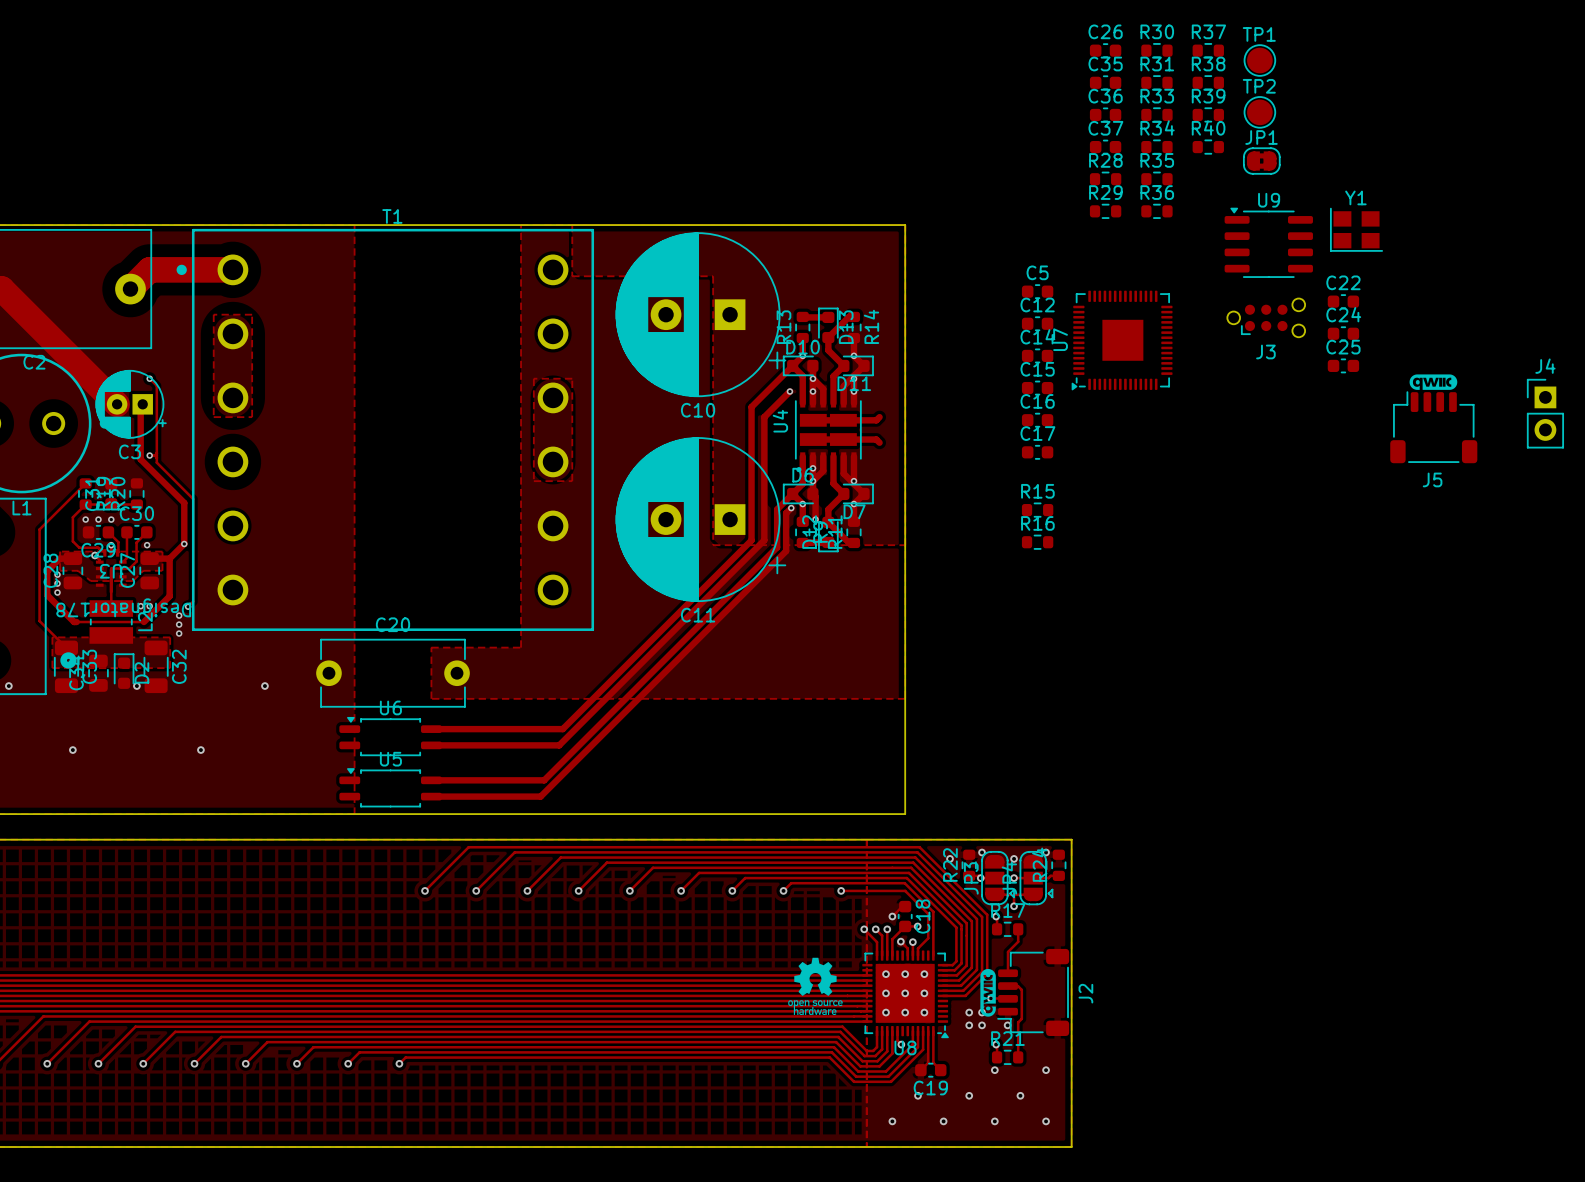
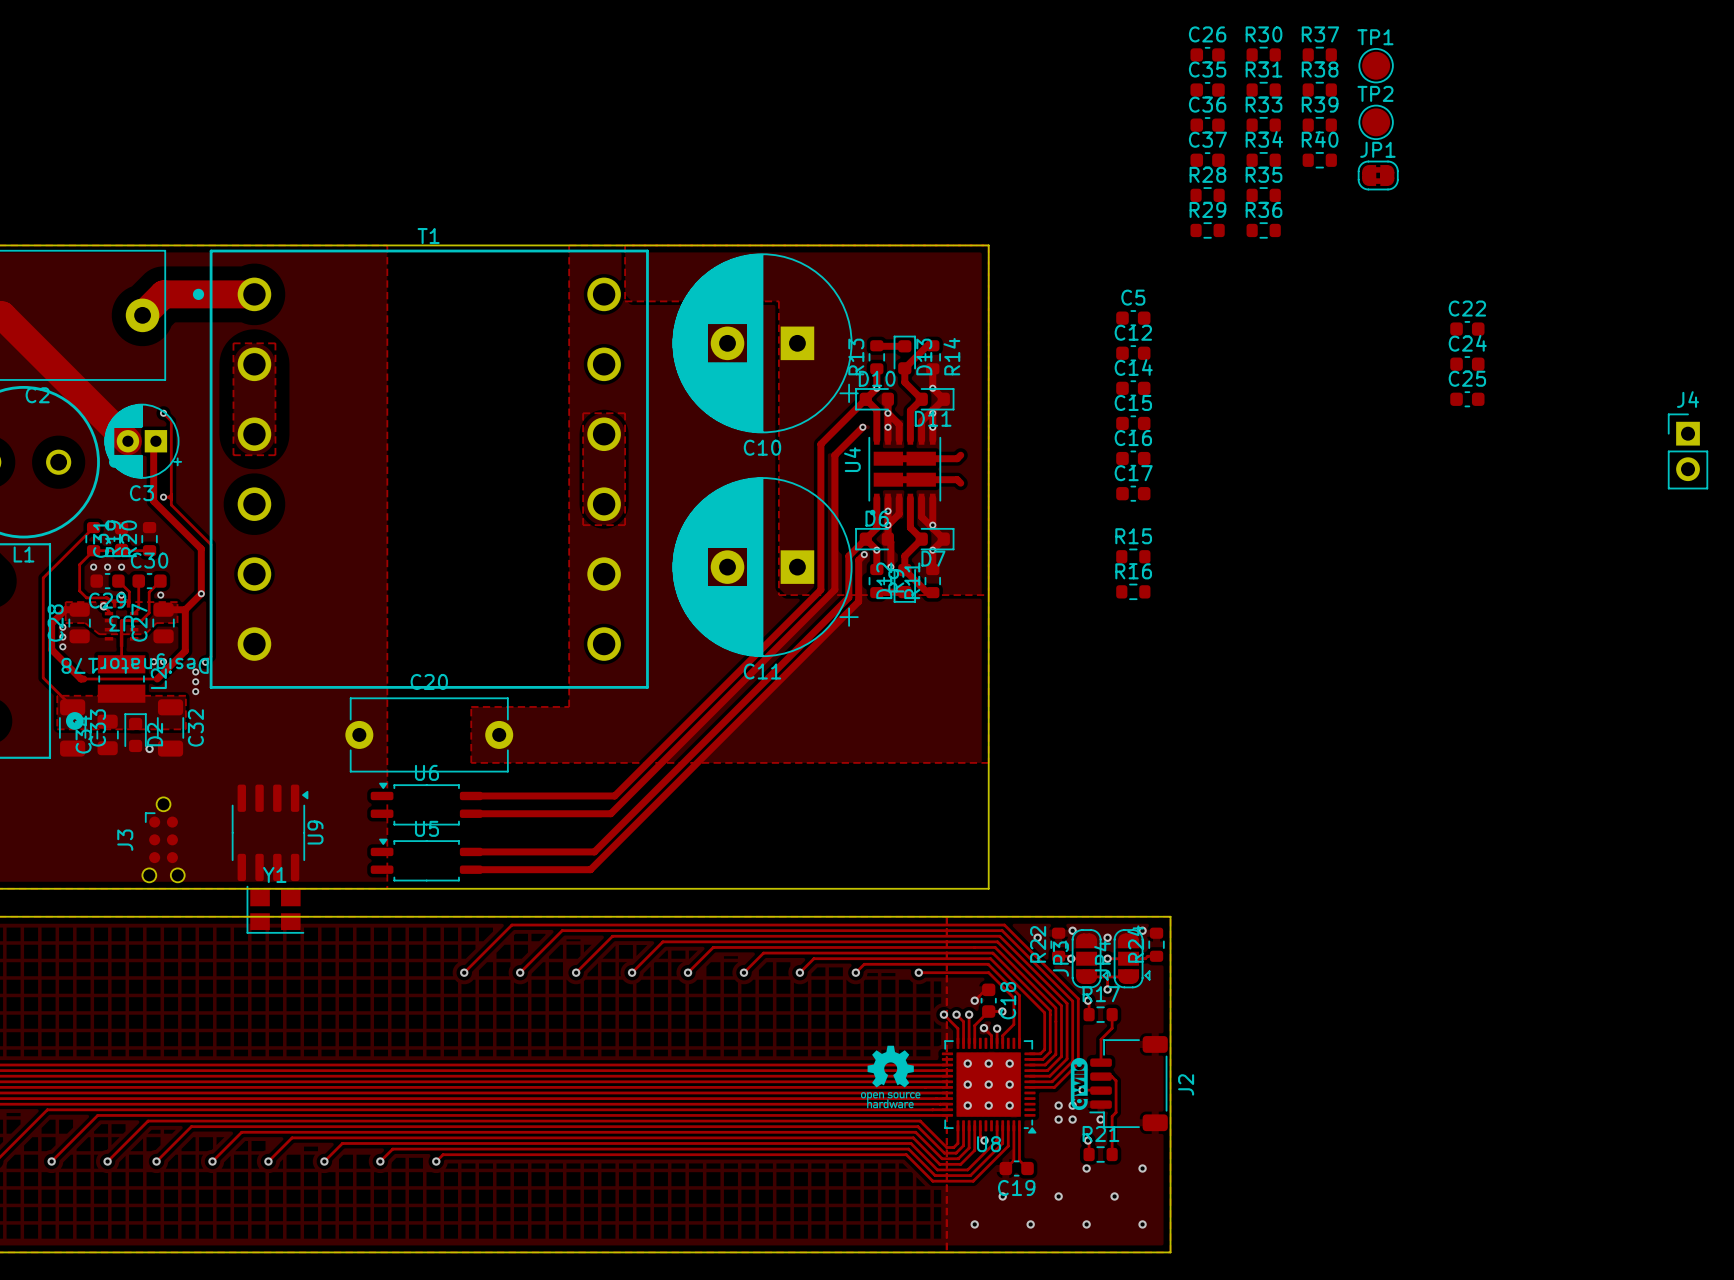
Y1 position: (1356, 229) -> (275, 909)
U9 rotation: 0° (1268, 242) -> 90° clockwise (270, 832)
U9 position: (1268, 242) -> (270, 832)
J3 rotation: 0° (1266, 317) -> 90° clockwise (163, 839)
J3 position: (1266, 317) -> (163, 839)
U7: (1122, 340) -> none
J5: (1433, 418) -> none
via: (8, 686) -> none
via: (264, 686) -> none
via: (72, 750) -> none
via: (200, 750) -> none

